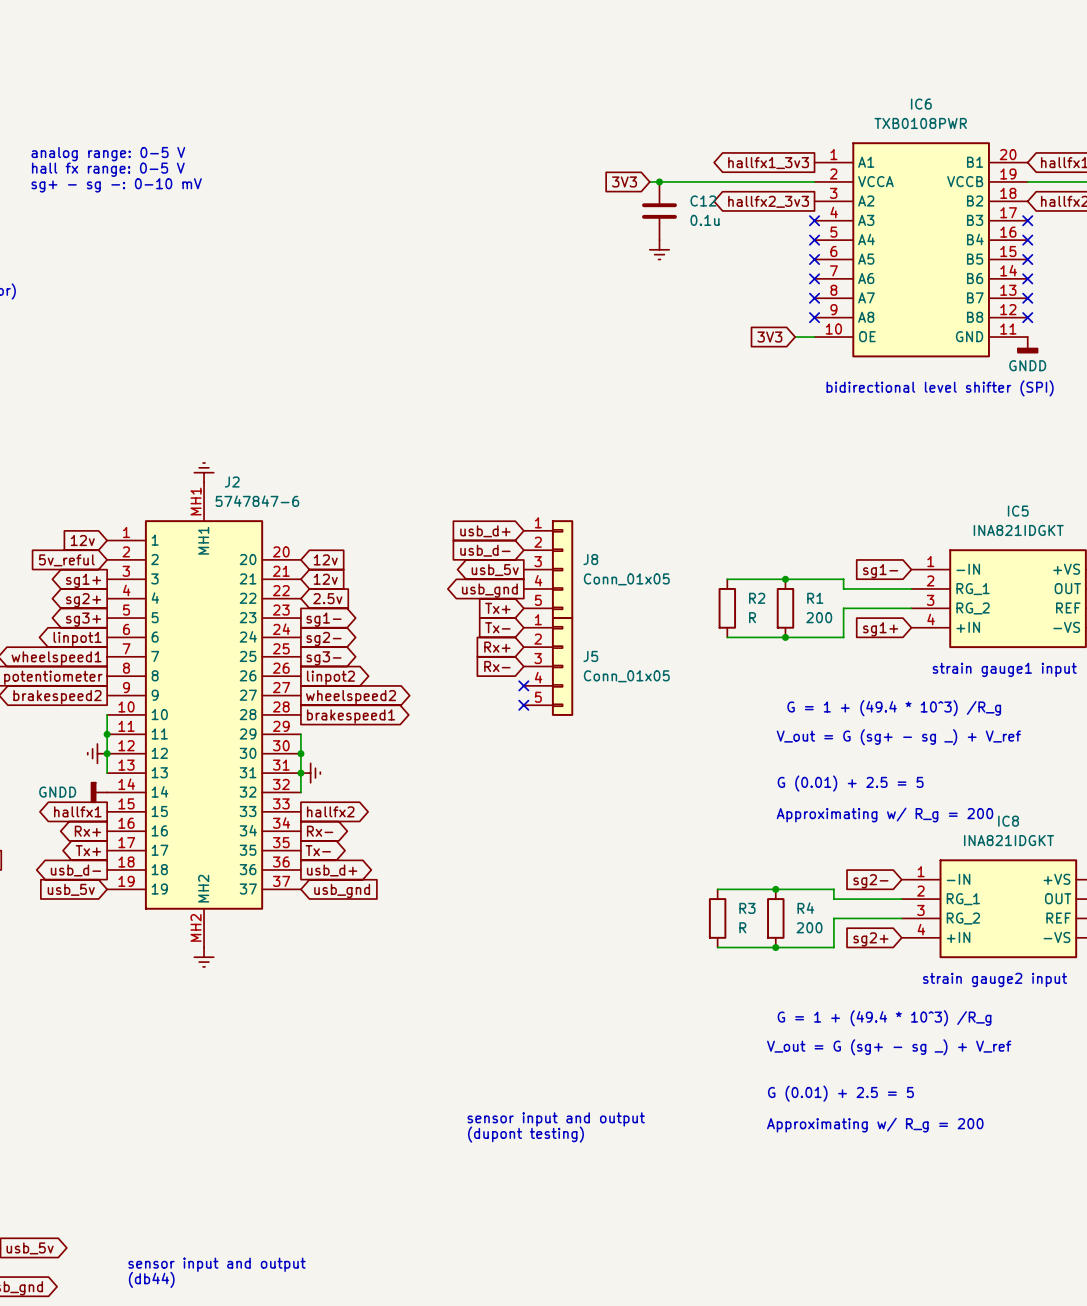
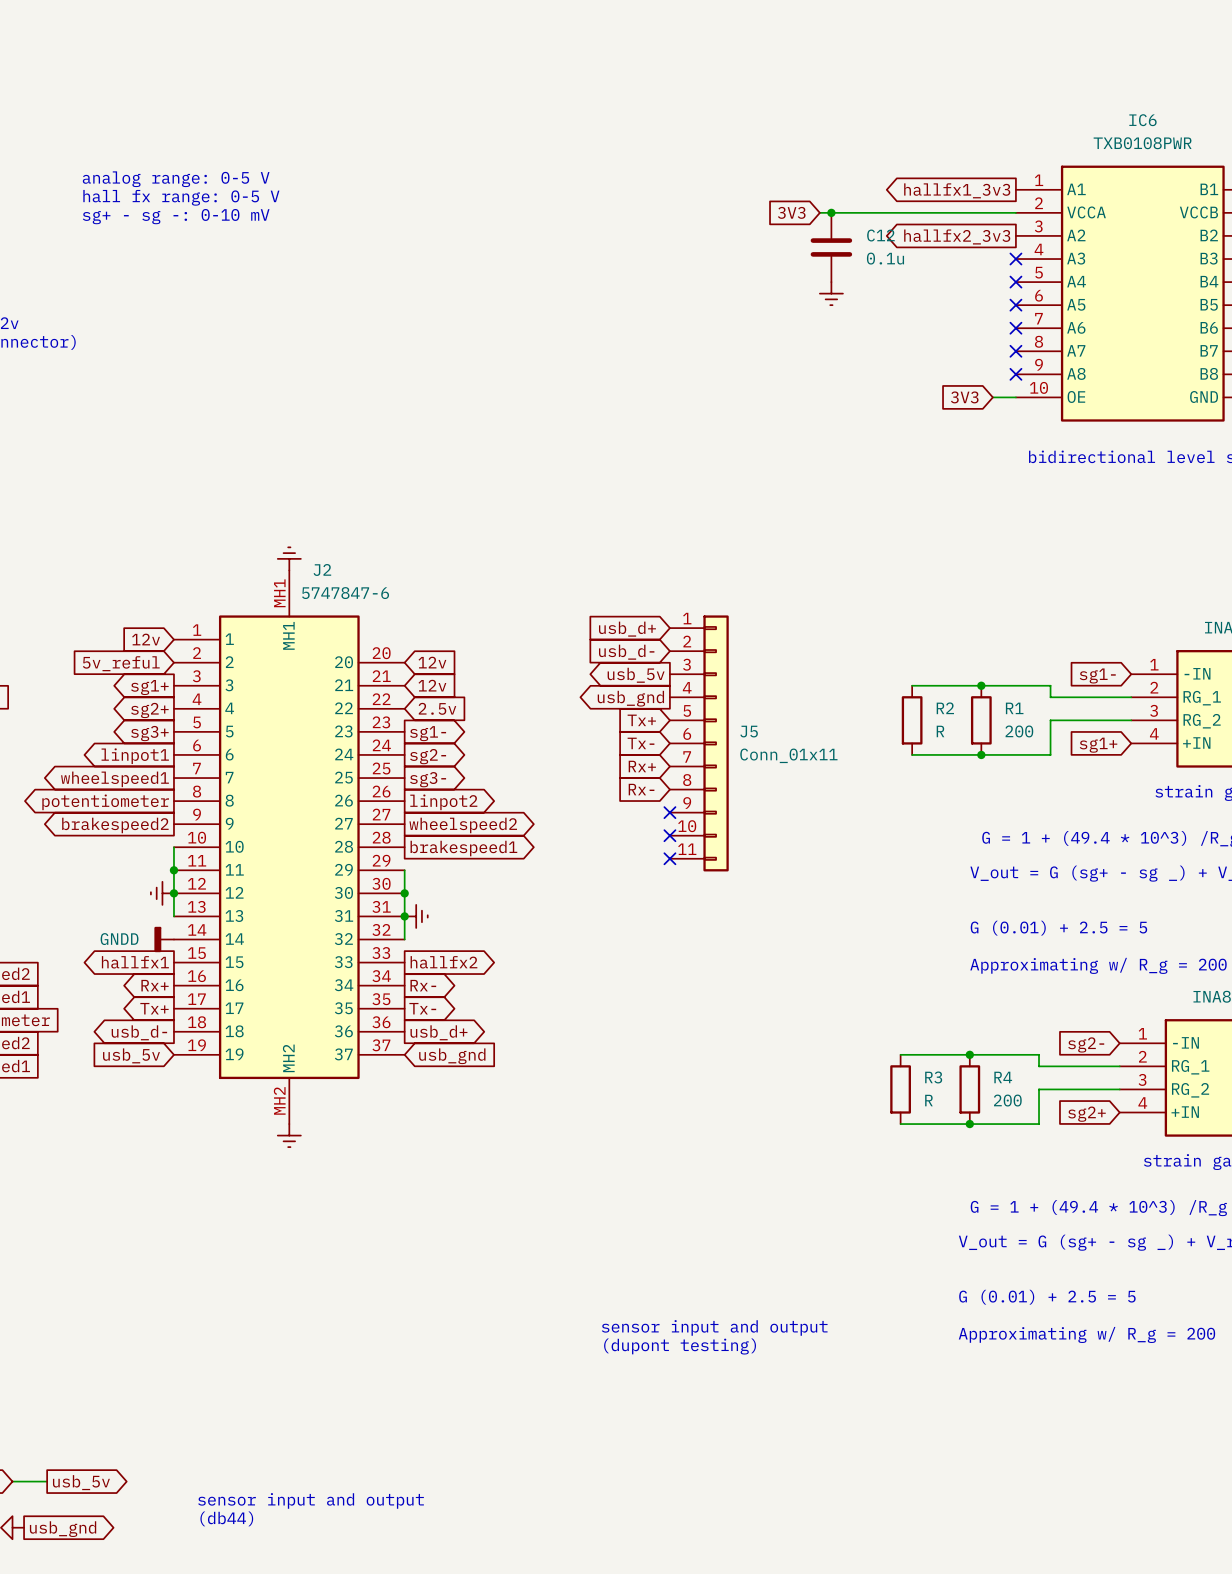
J8: Conn_01x05 (548, 569) -> none
J5 symbol: [523, 617, 574, 716] -> [669, 615, 729, 872]
J5 value: Conn_01x05 (626, 676) -> Conn_01x11 (788, 755)
no-connect mark: none -> (669, 858)

